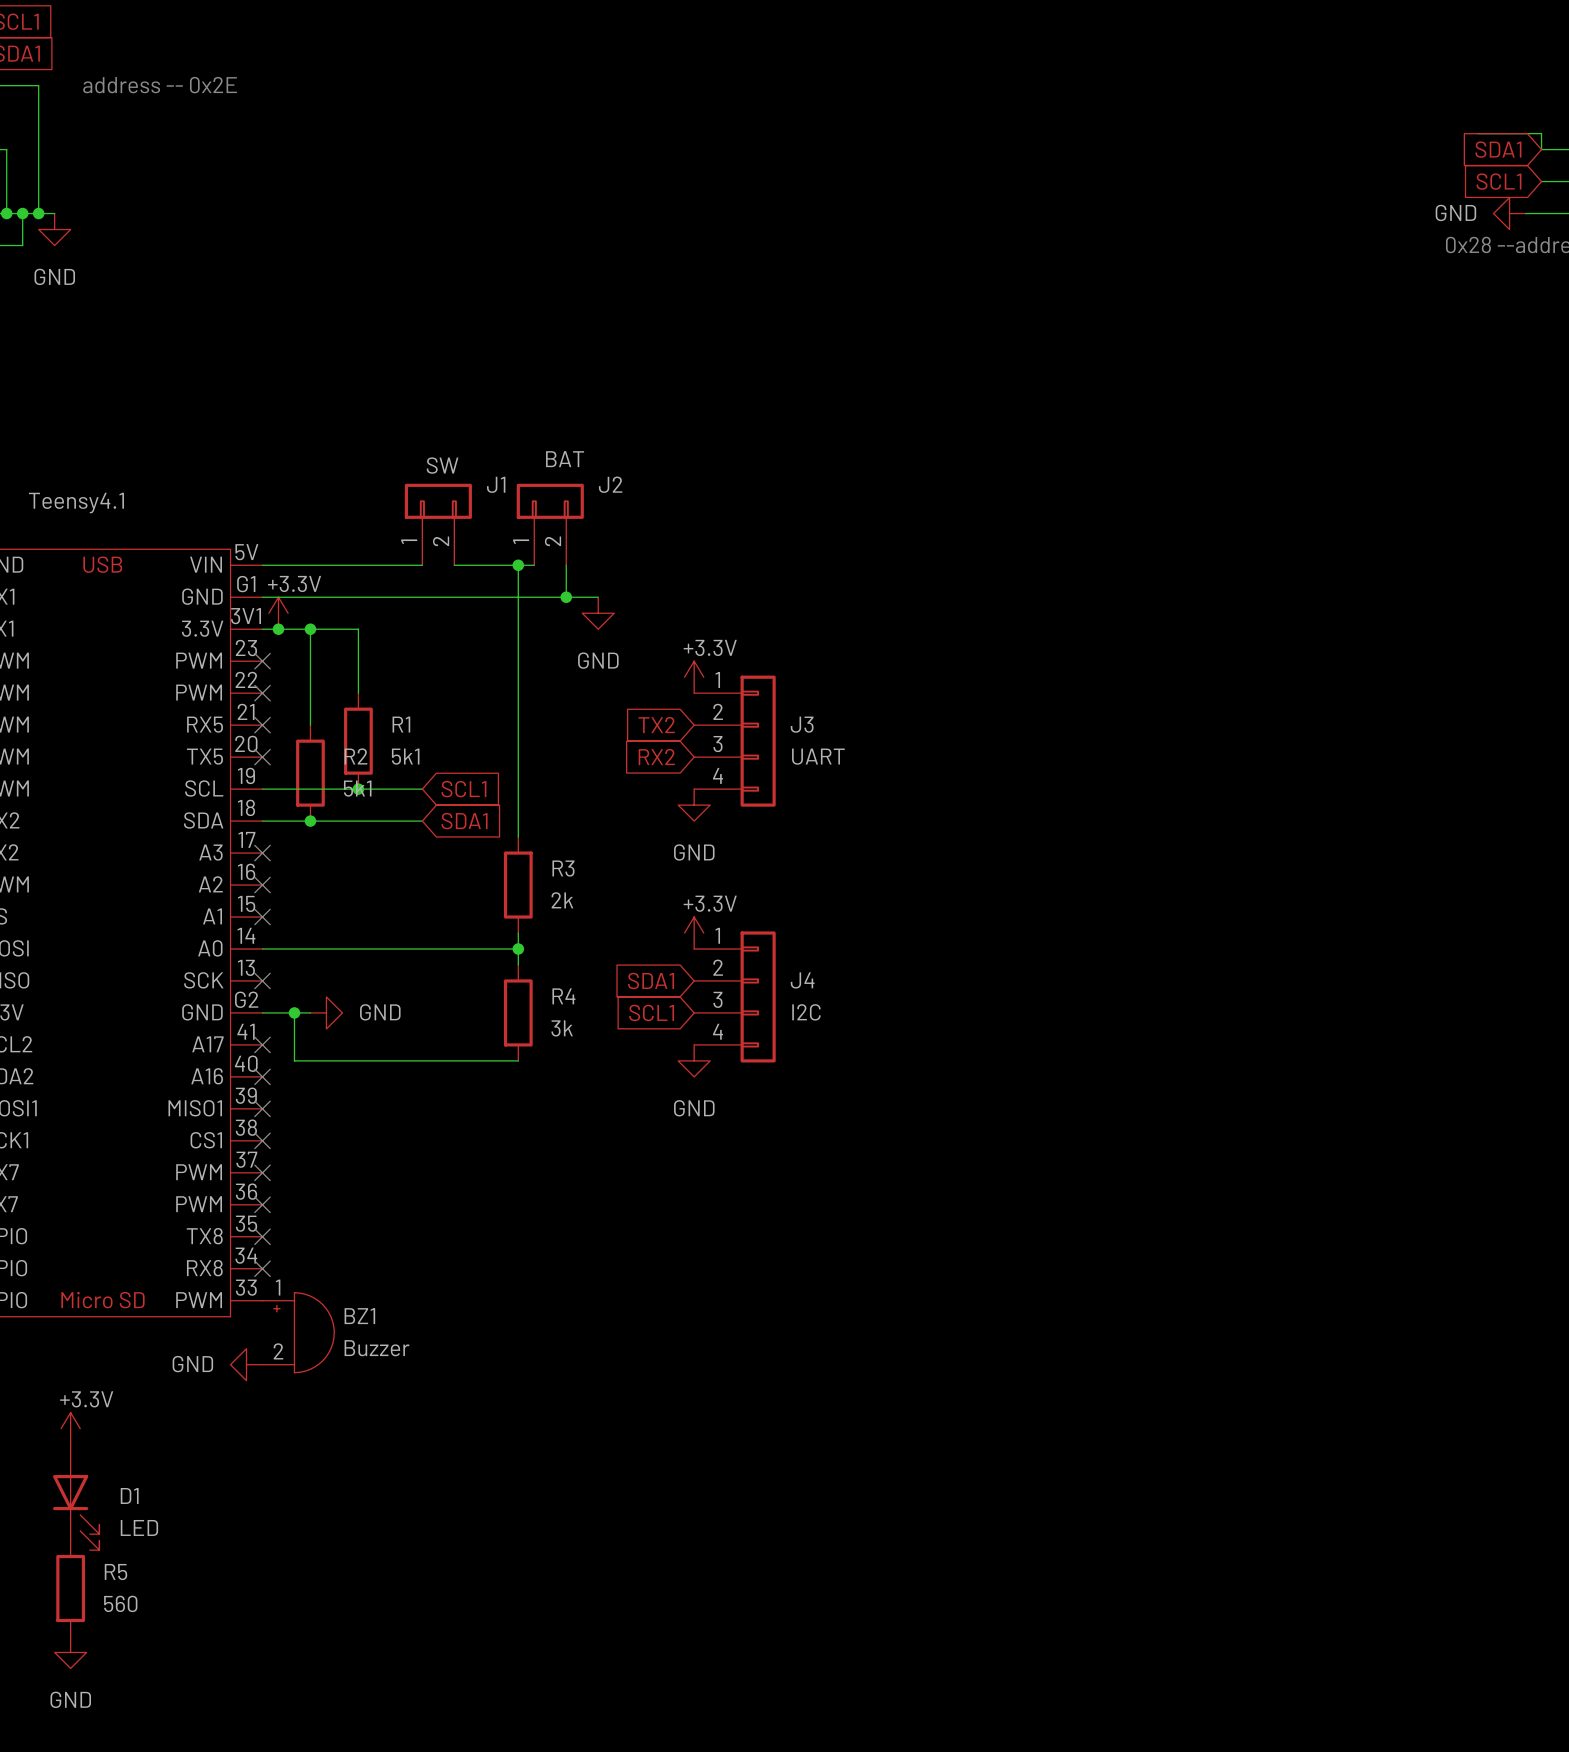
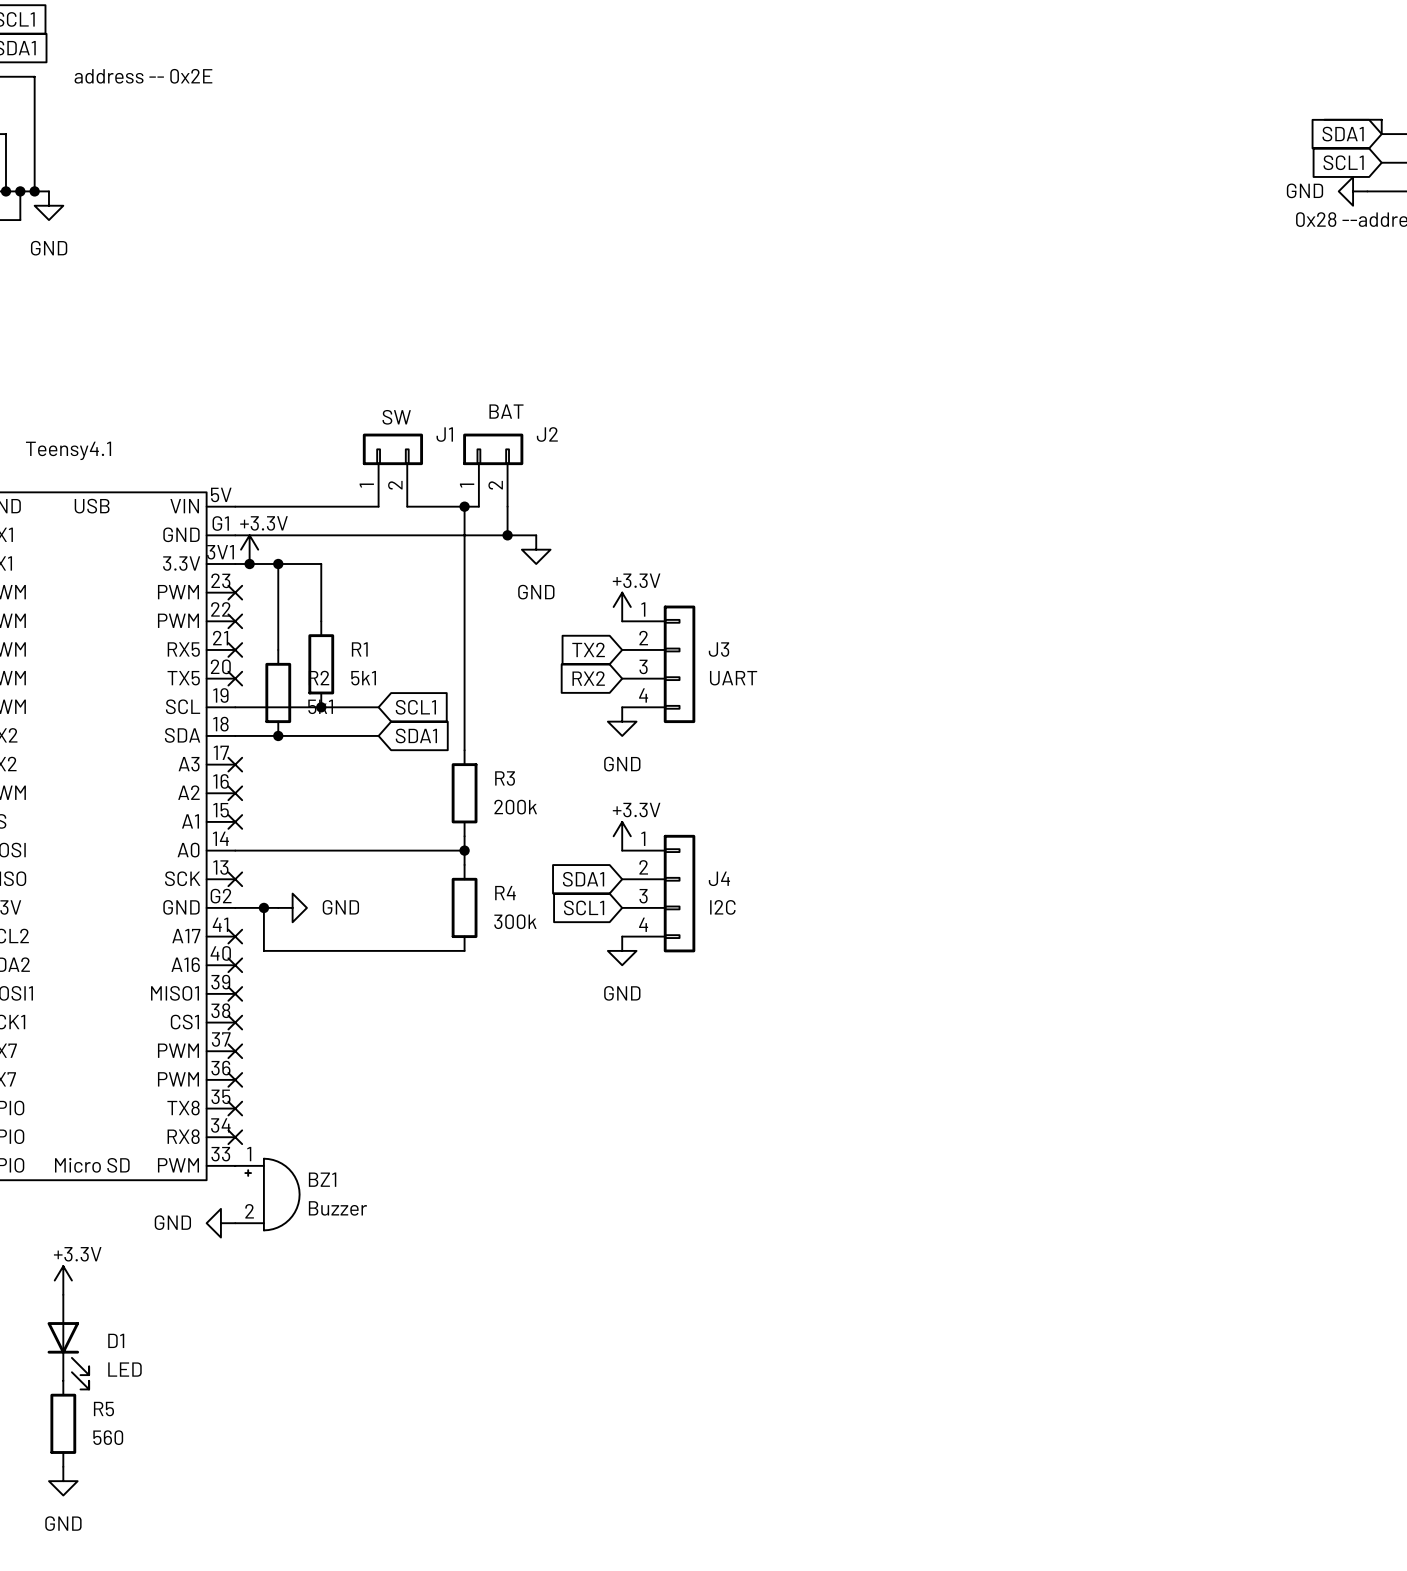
R3 value: 2k (562, 900) -> 200k (515, 807)
R4 value: 3k (562, 1028) -> 300k (515, 921)

